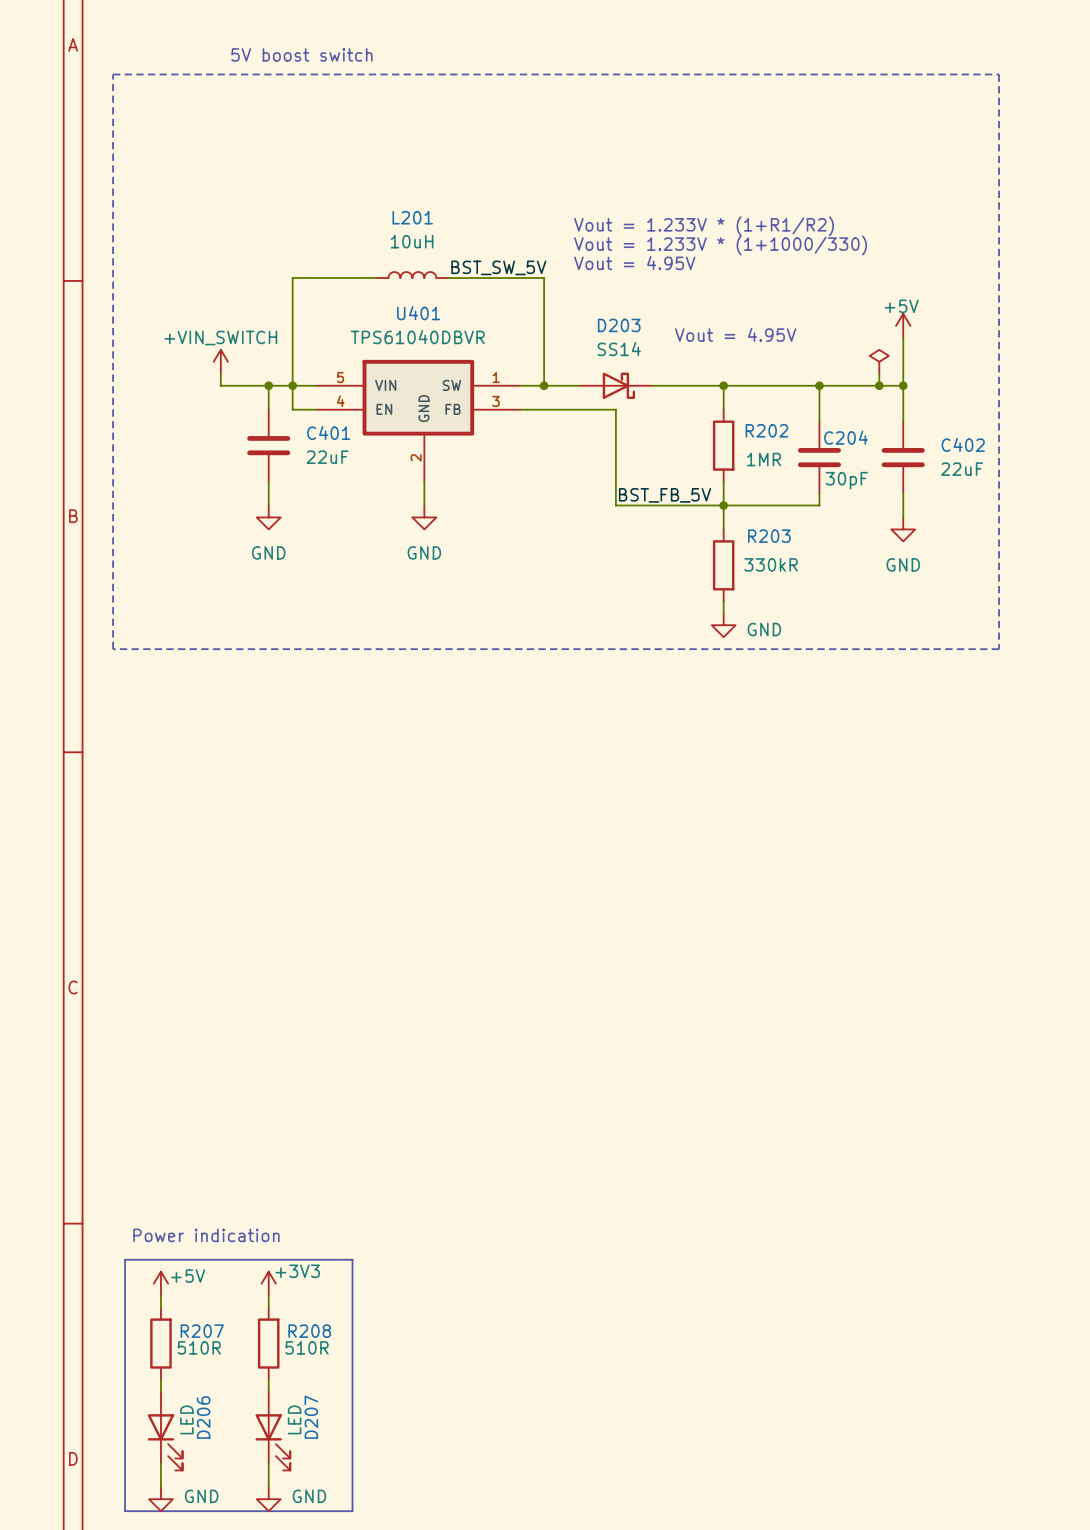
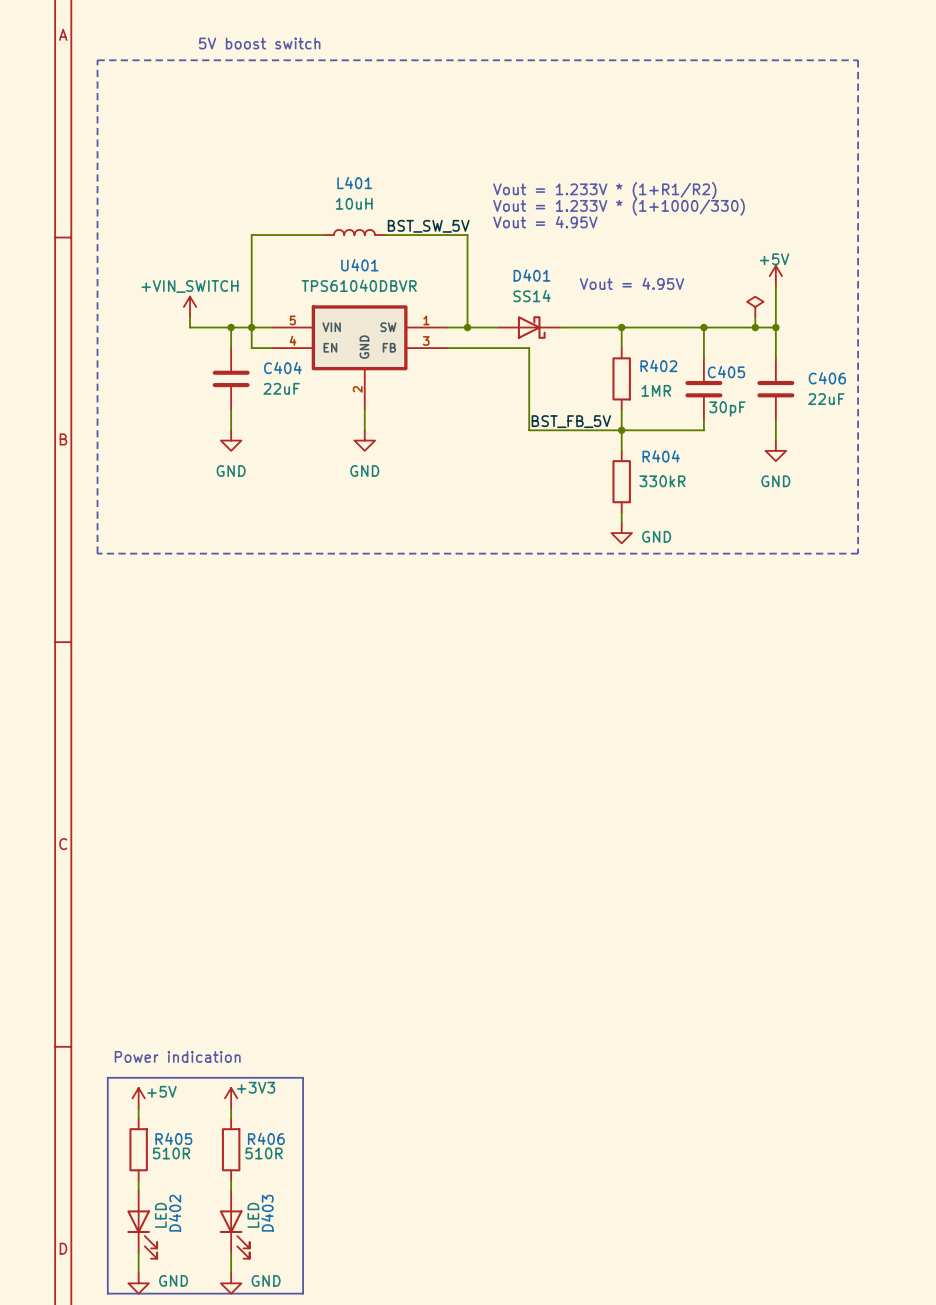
L201 name: L201 (412, 217) -> L401 (354, 183)
D203 name: D203 (619, 325) -> D401 (532, 275)
R202 name: R202 (766, 430) -> R402 (658, 365)
C401 name: C401 (328, 432) -> C404 (282, 368)
C204 name: C204 (845, 437) -> C405 (726, 372)
C402 name: C402 (963, 444) -> C406 (827, 378)
R203 name: R203 (769, 536) -> R404 (661, 456)
R207 name: R207 (202, 1331) -> R405 (173, 1138)
R208 name: R208 (309, 1331) -> R406 (266, 1138)
D206 name: D206 (203, 1417) -> D402 (175, 1213)
D207 name: D207 (311, 1417) -> D403 (267, 1213)

